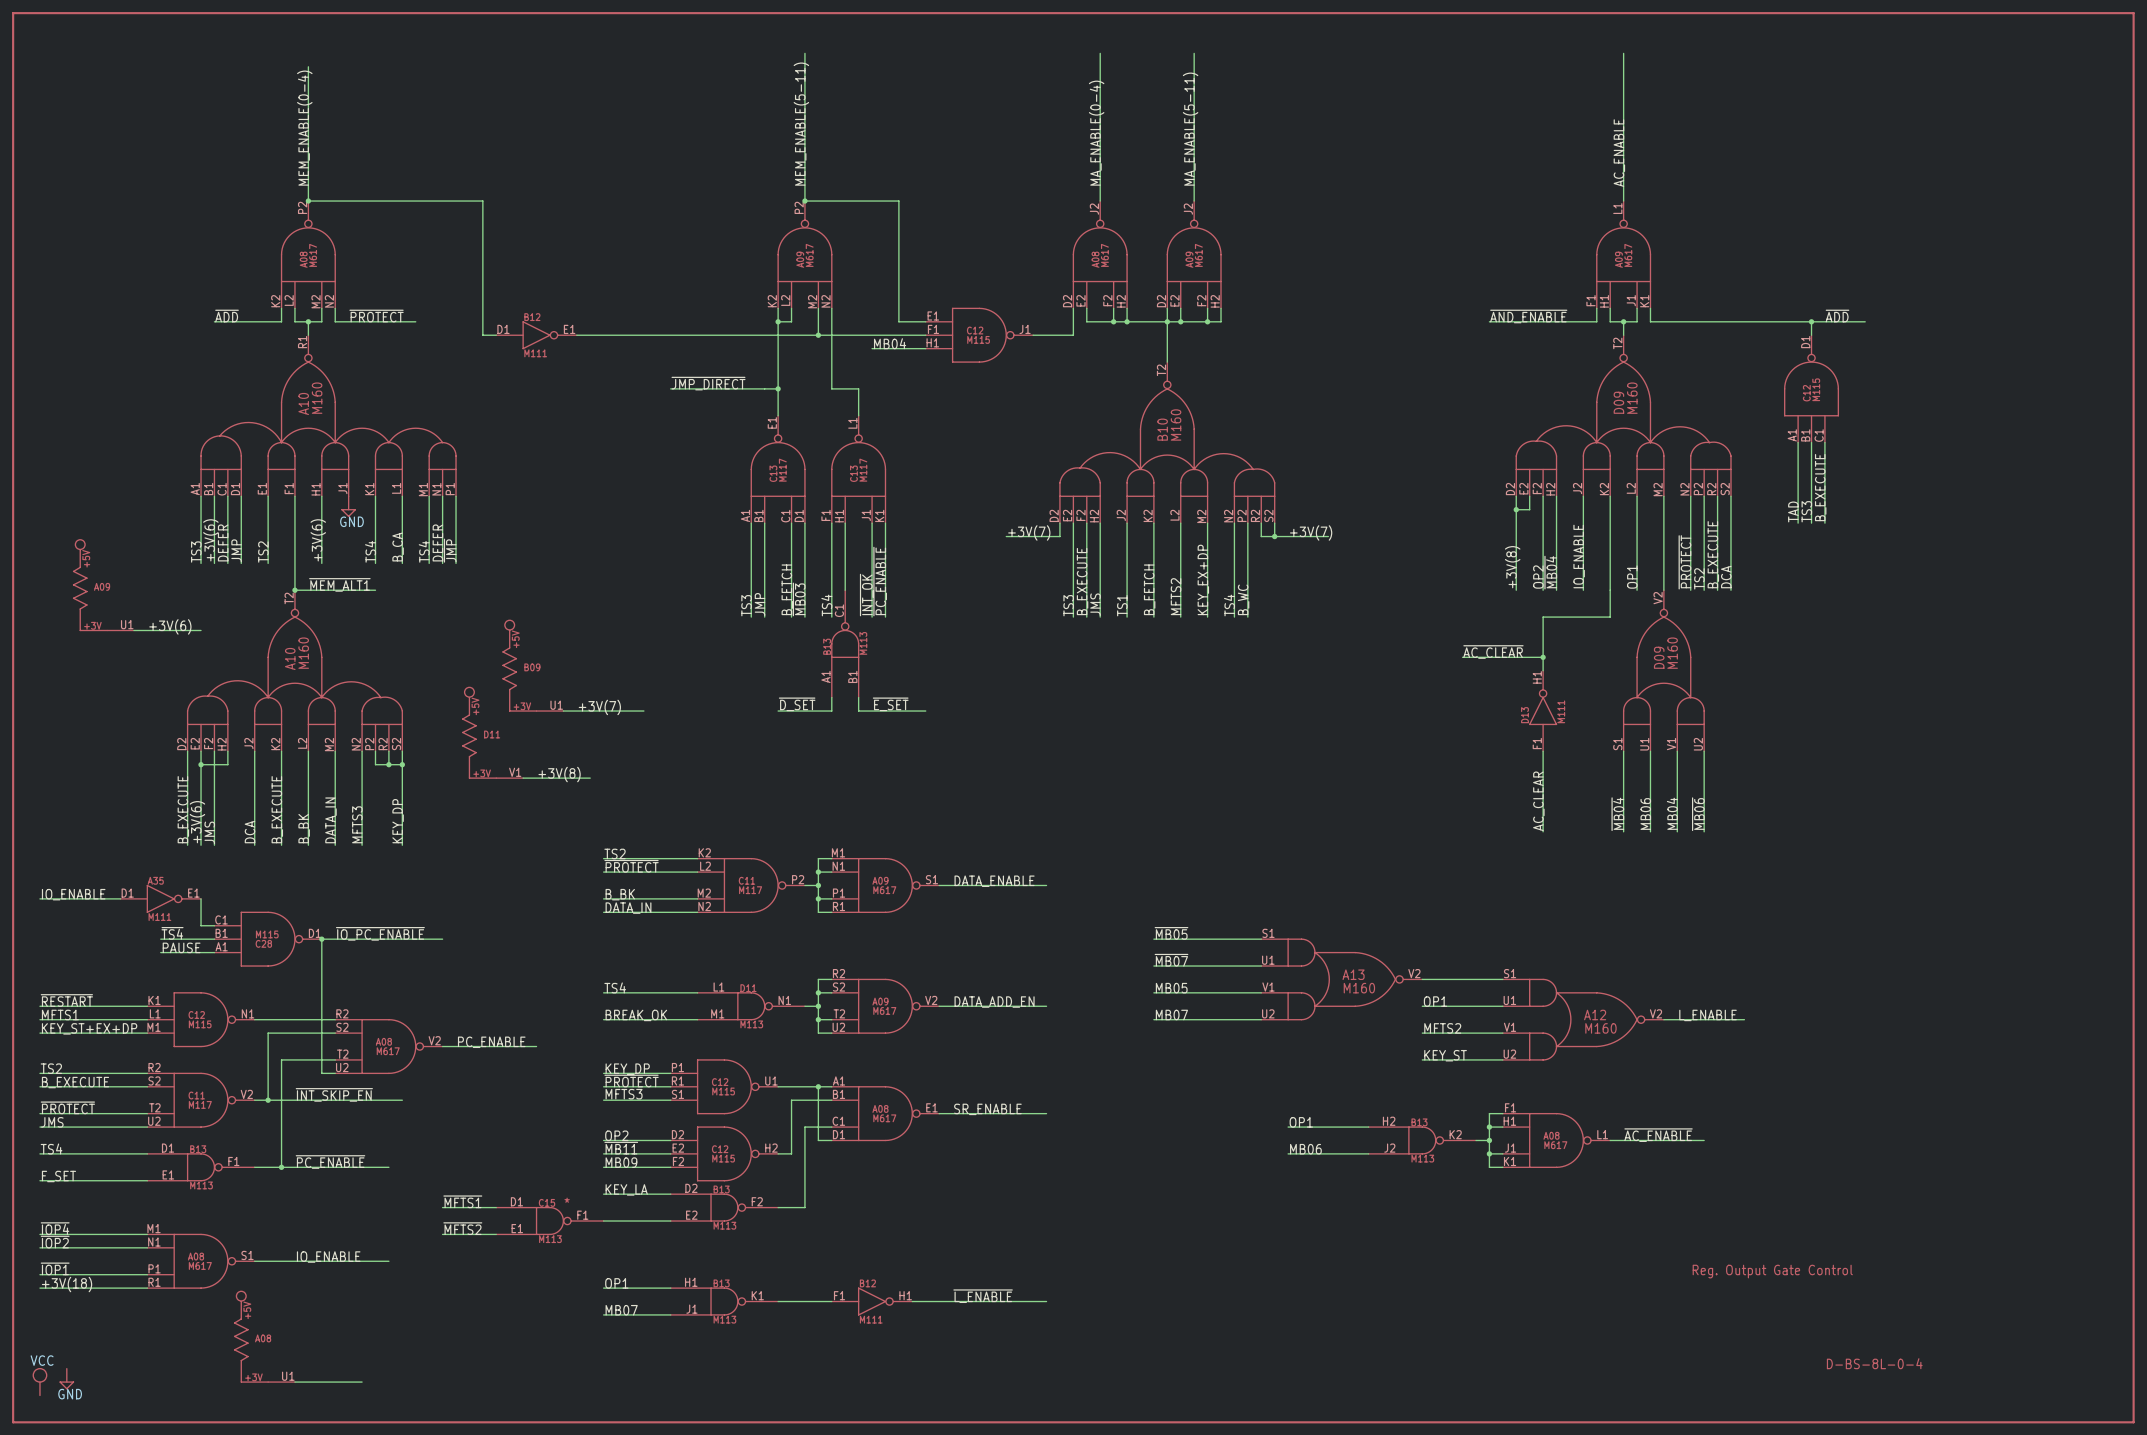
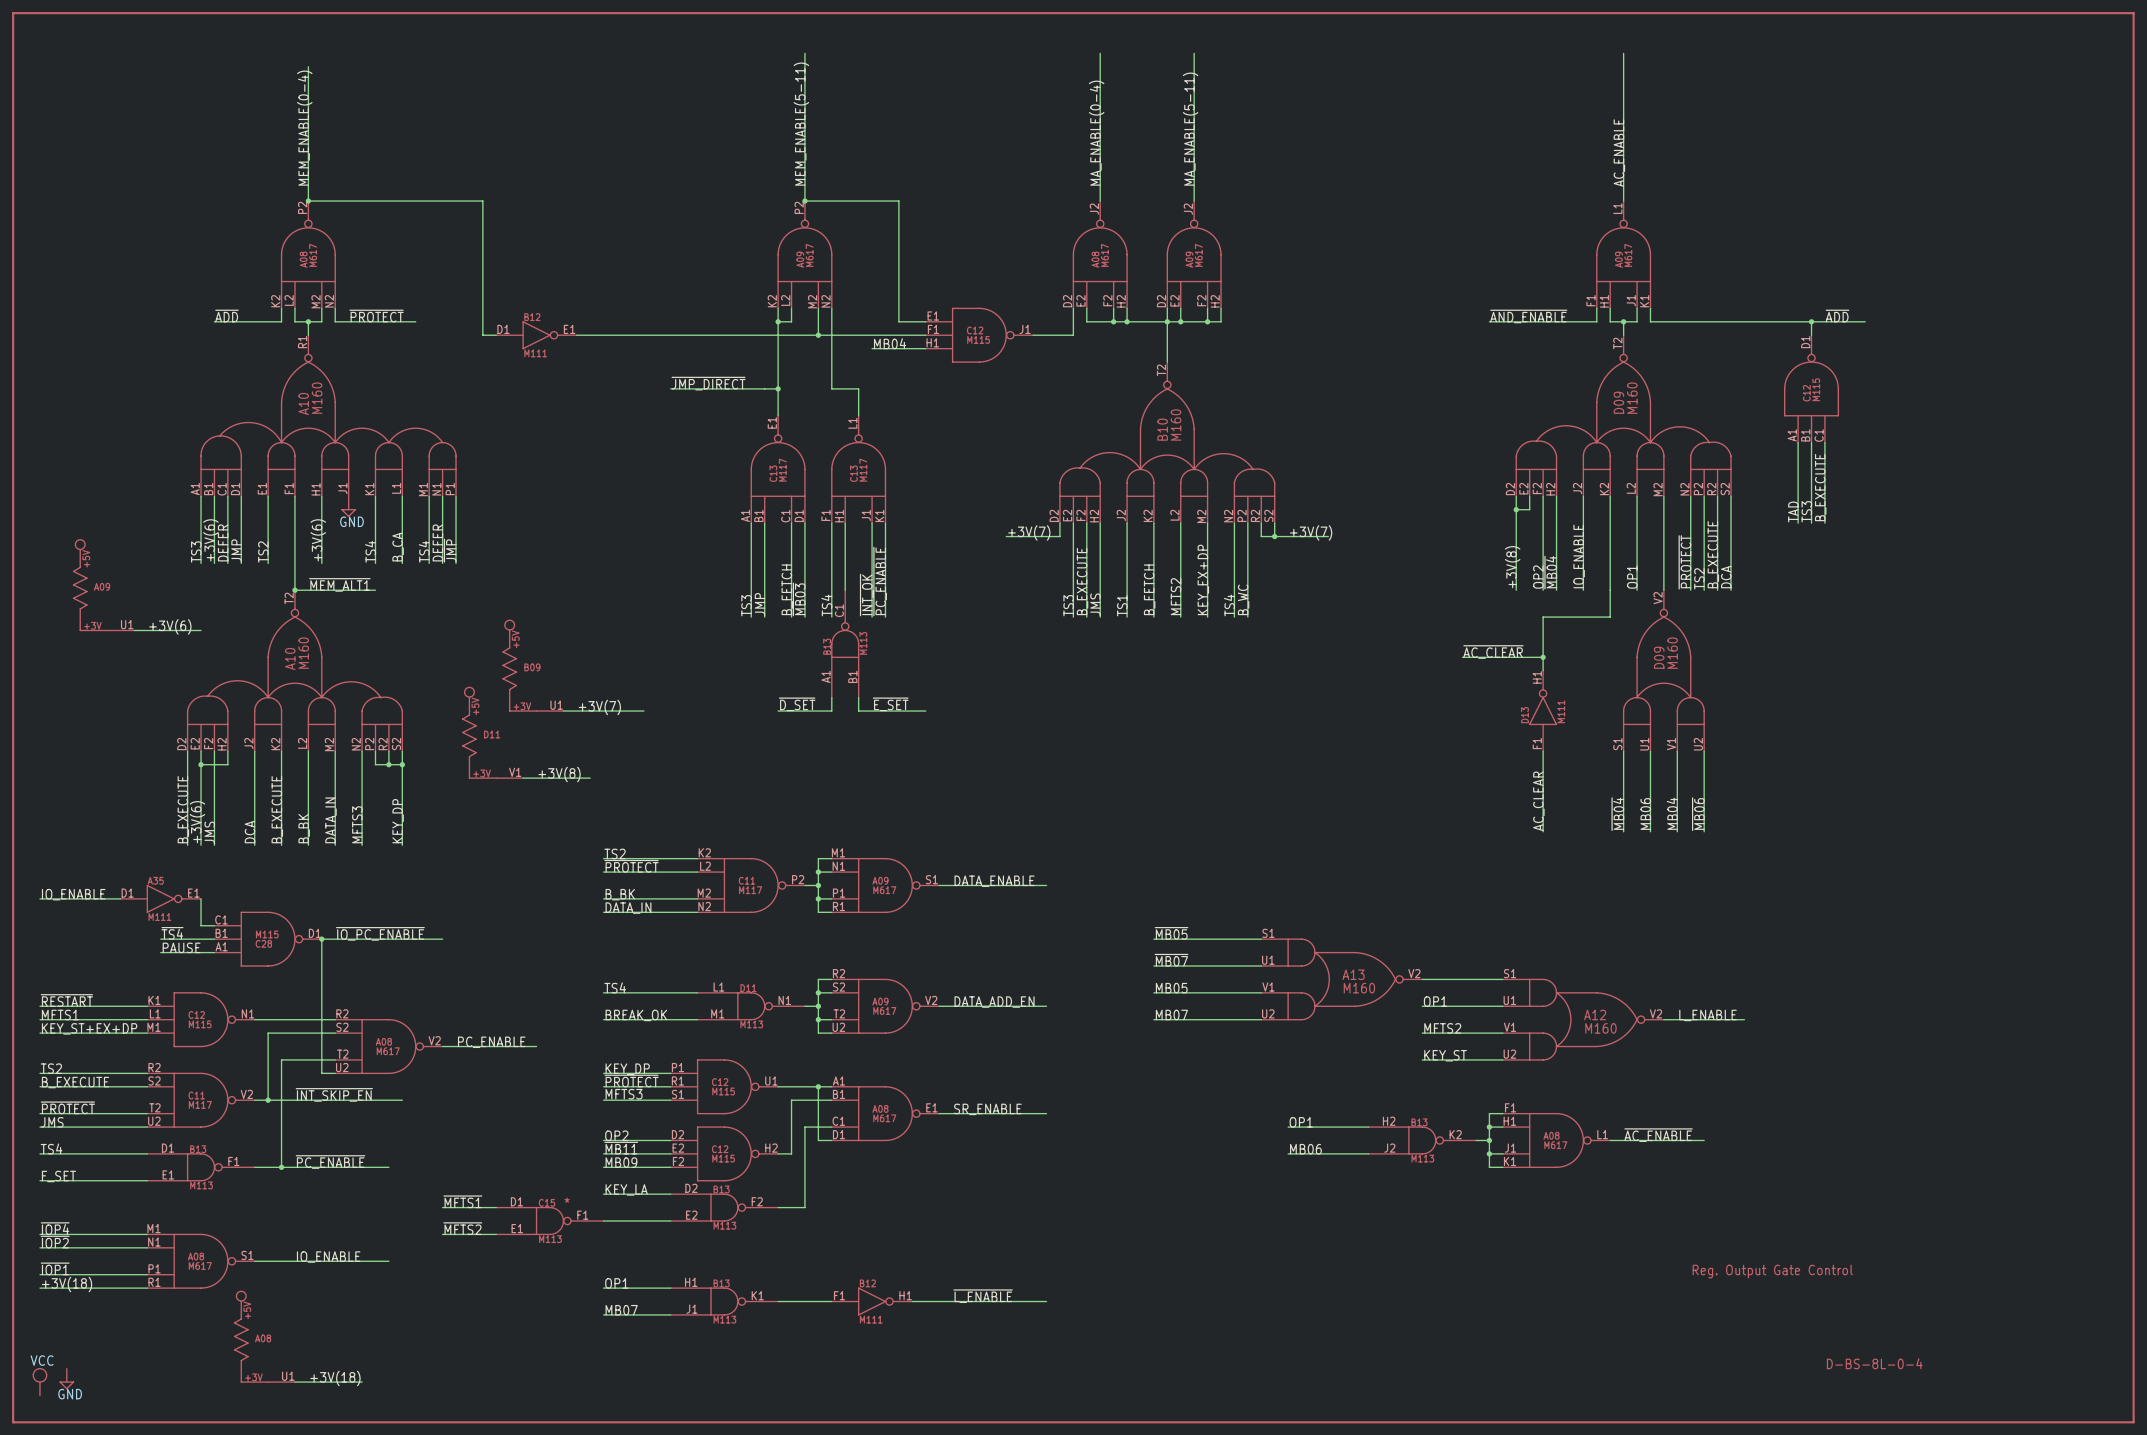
label: none -> +3V(18) (335, 1378)

